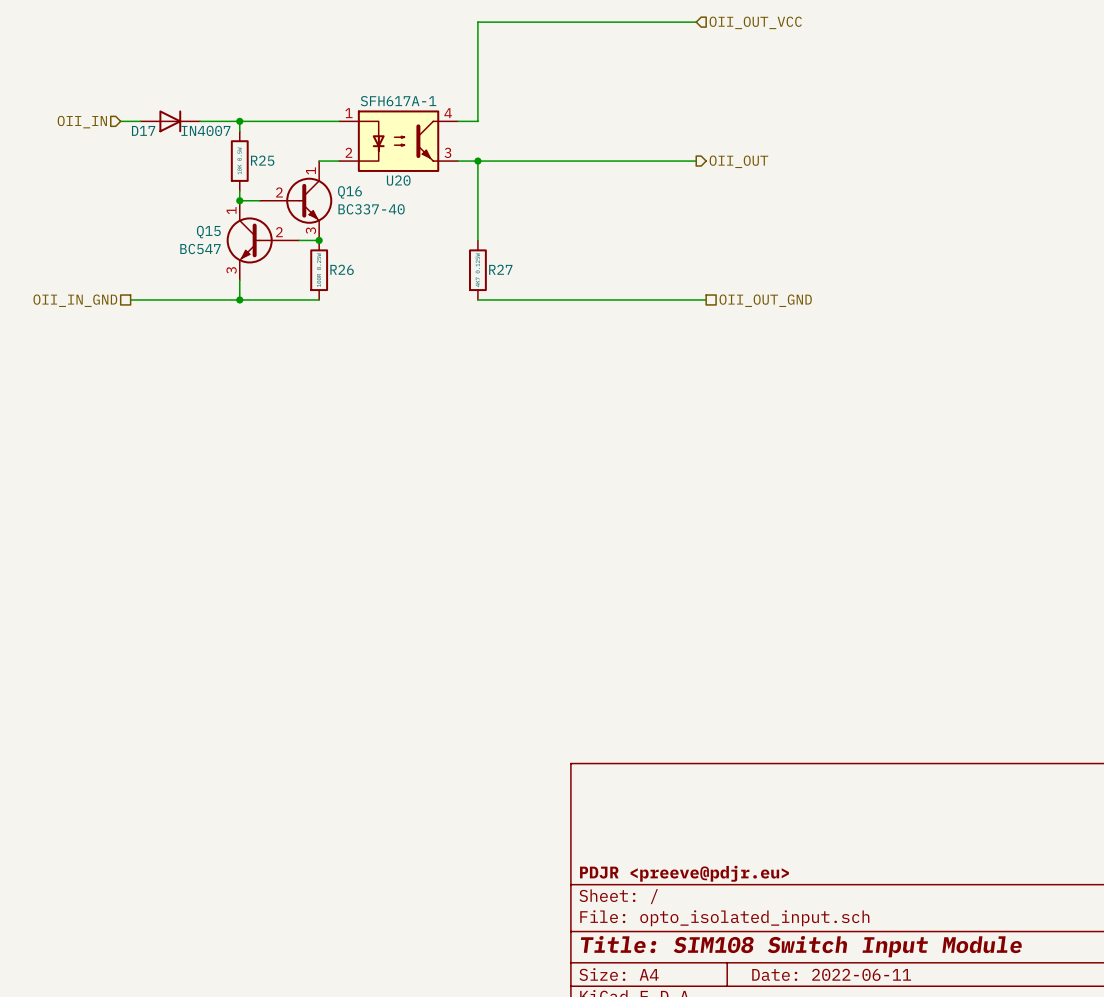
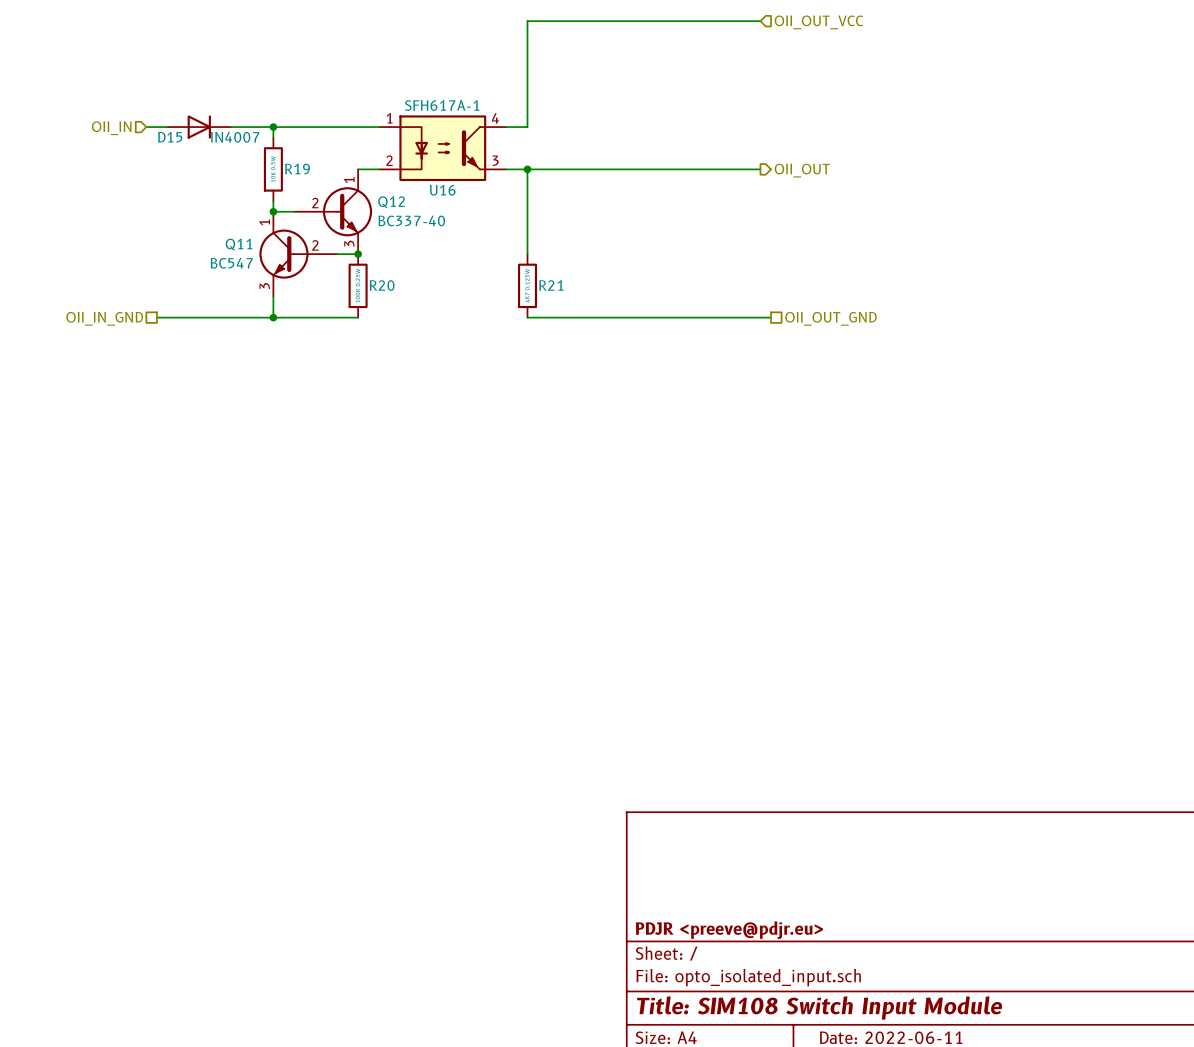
D17 name: D17 (143, 130) -> D15 (170, 137)
R25 name: R25 (262, 160) -> R19 (297, 169)
U20 name: U20 (398, 180) -> U16 (442, 190)
Q16 name: Q16 (349, 192) -> Q12 (391, 202)
Q15 name: Q15 (208, 232) -> Q11 (239, 244)
R26 name: R26 (342, 269) -> R20 (382, 285)
R27 name: R27 (500, 269) -> R21 (551, 285)

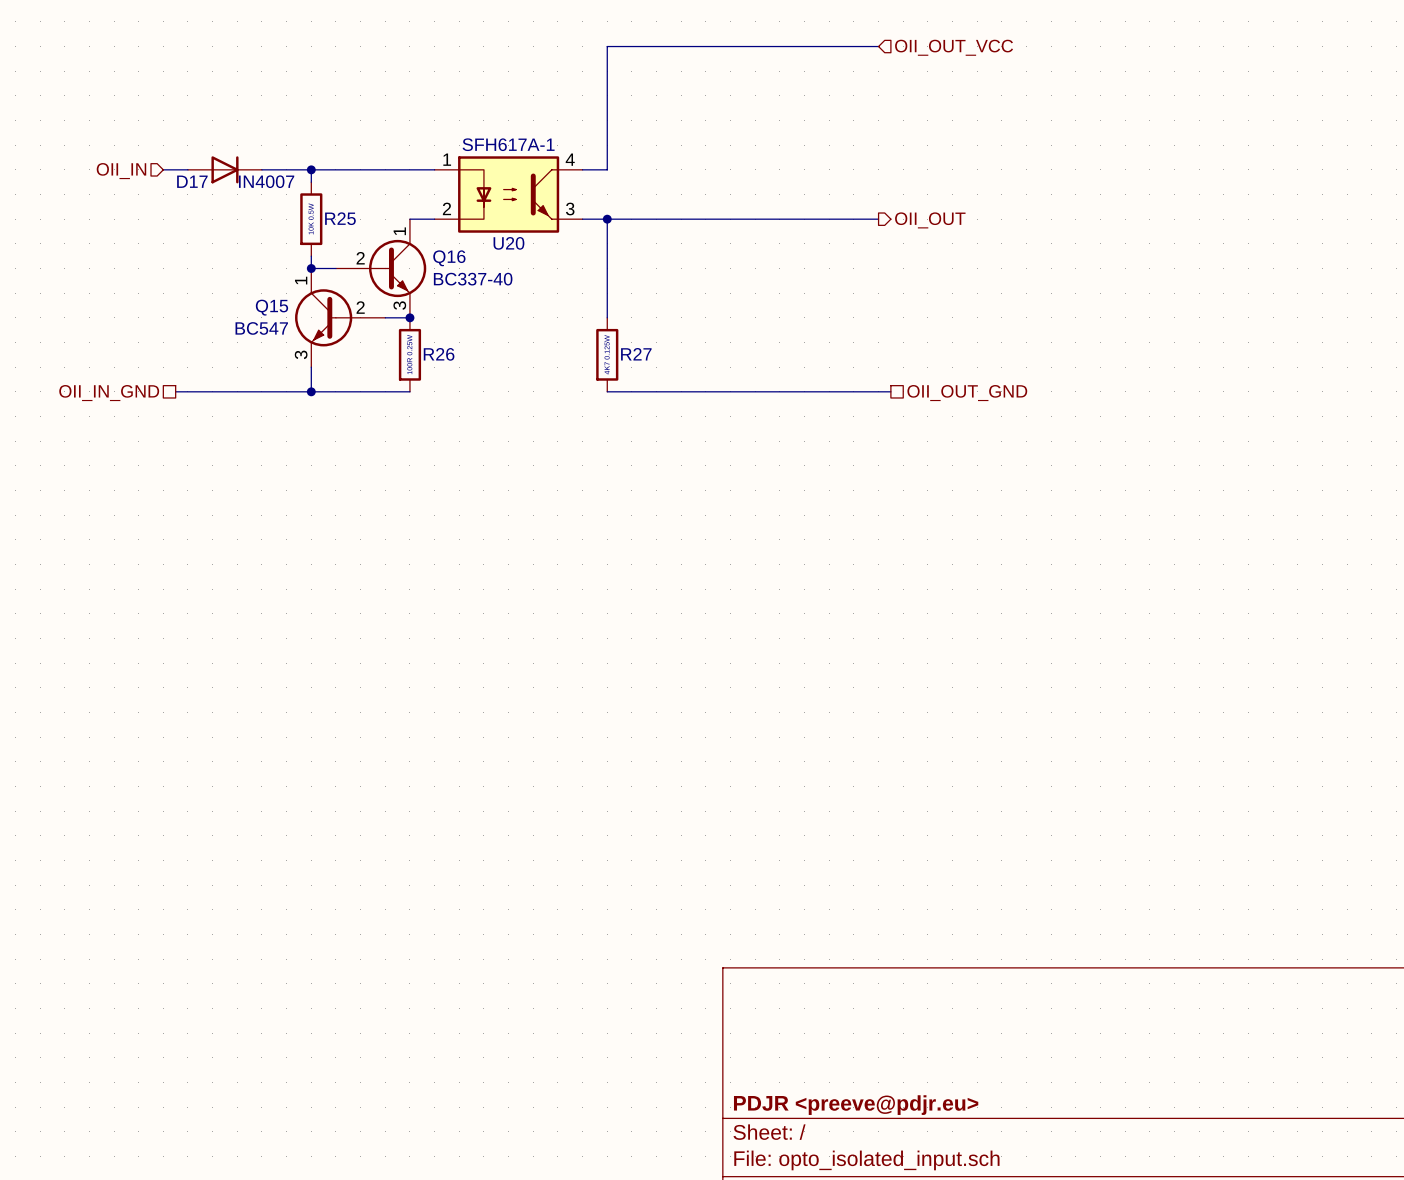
D15 name: D15 (170, 137) -> D17 (192, 181)
R19 name: R19 (297, 169) -> R25 (340, 218)
U16 name: U16 (442, 190) -> U20 (508, 243)
Q12 name: Q12 (391, 202) -> Q16 (449, 258)
Q11 name: Q11 (239, 244) -> Q15 (271, 307)
R20 name: R20 (382, 285) -> R26 (439, 354)
R21 name: R21 (551, 285) -> R27 (636, 354)

